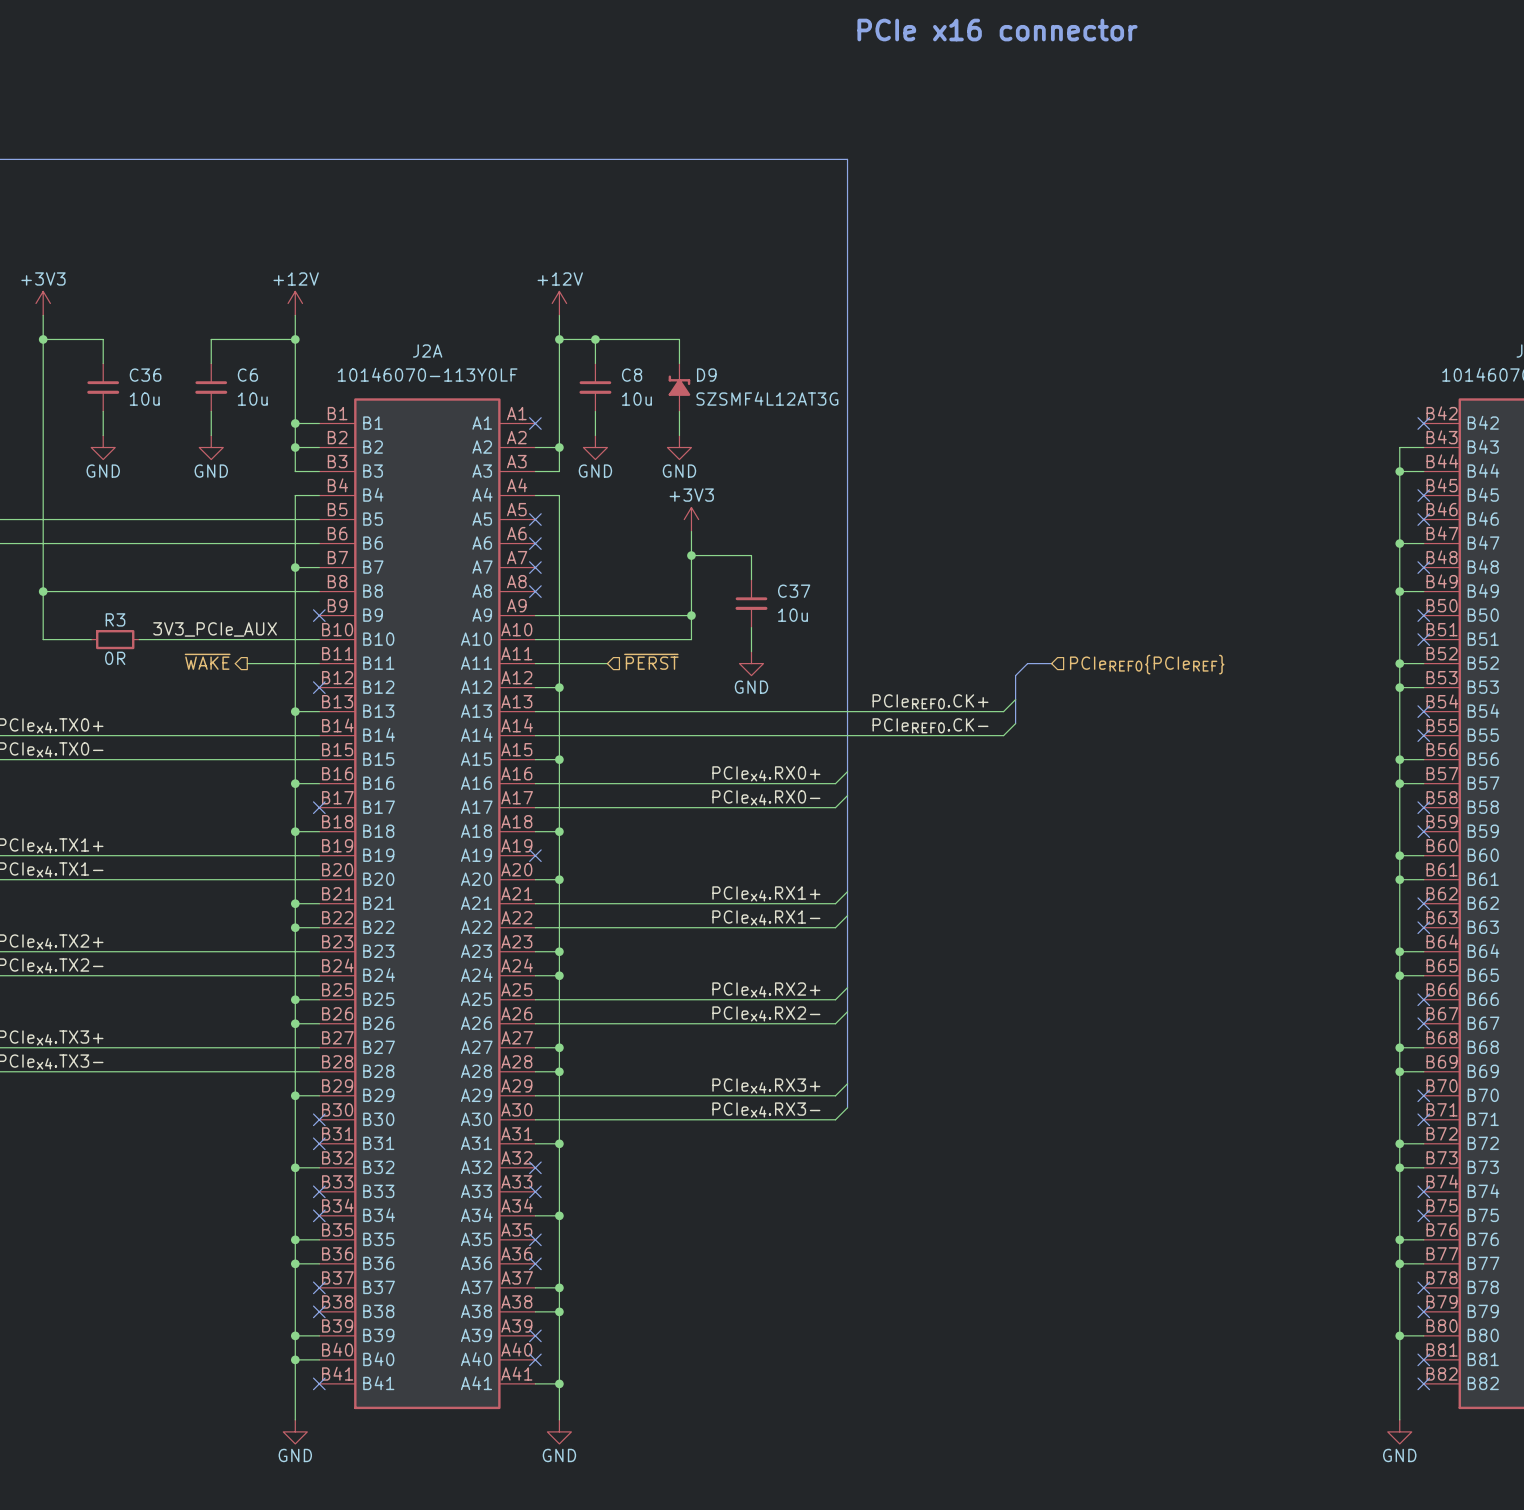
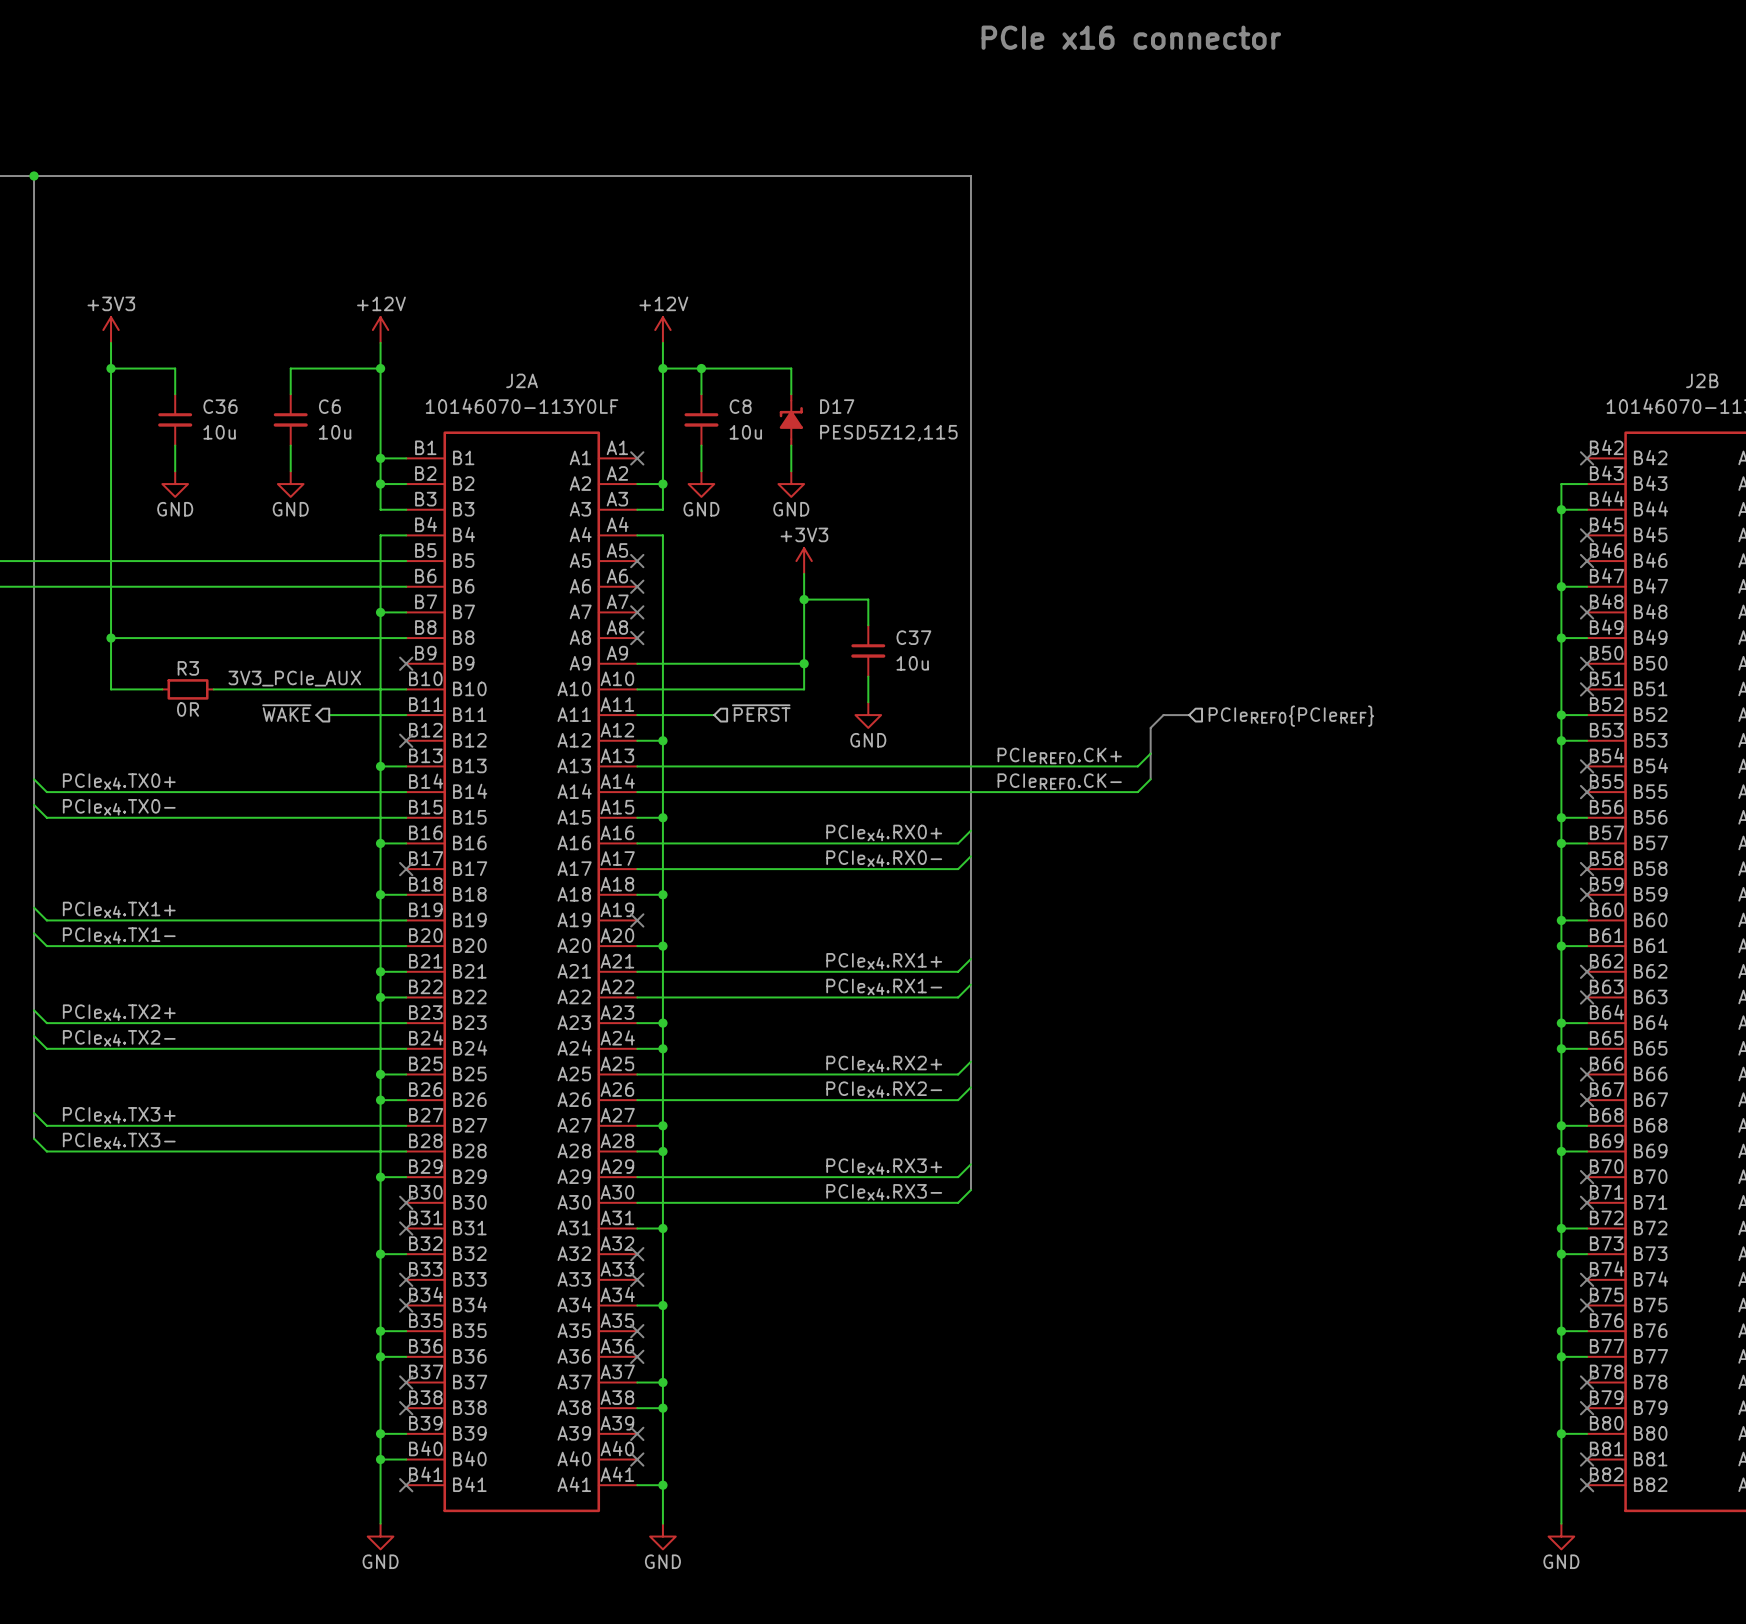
D9: (679, 387) -> none
D17: none -> (791, 419)

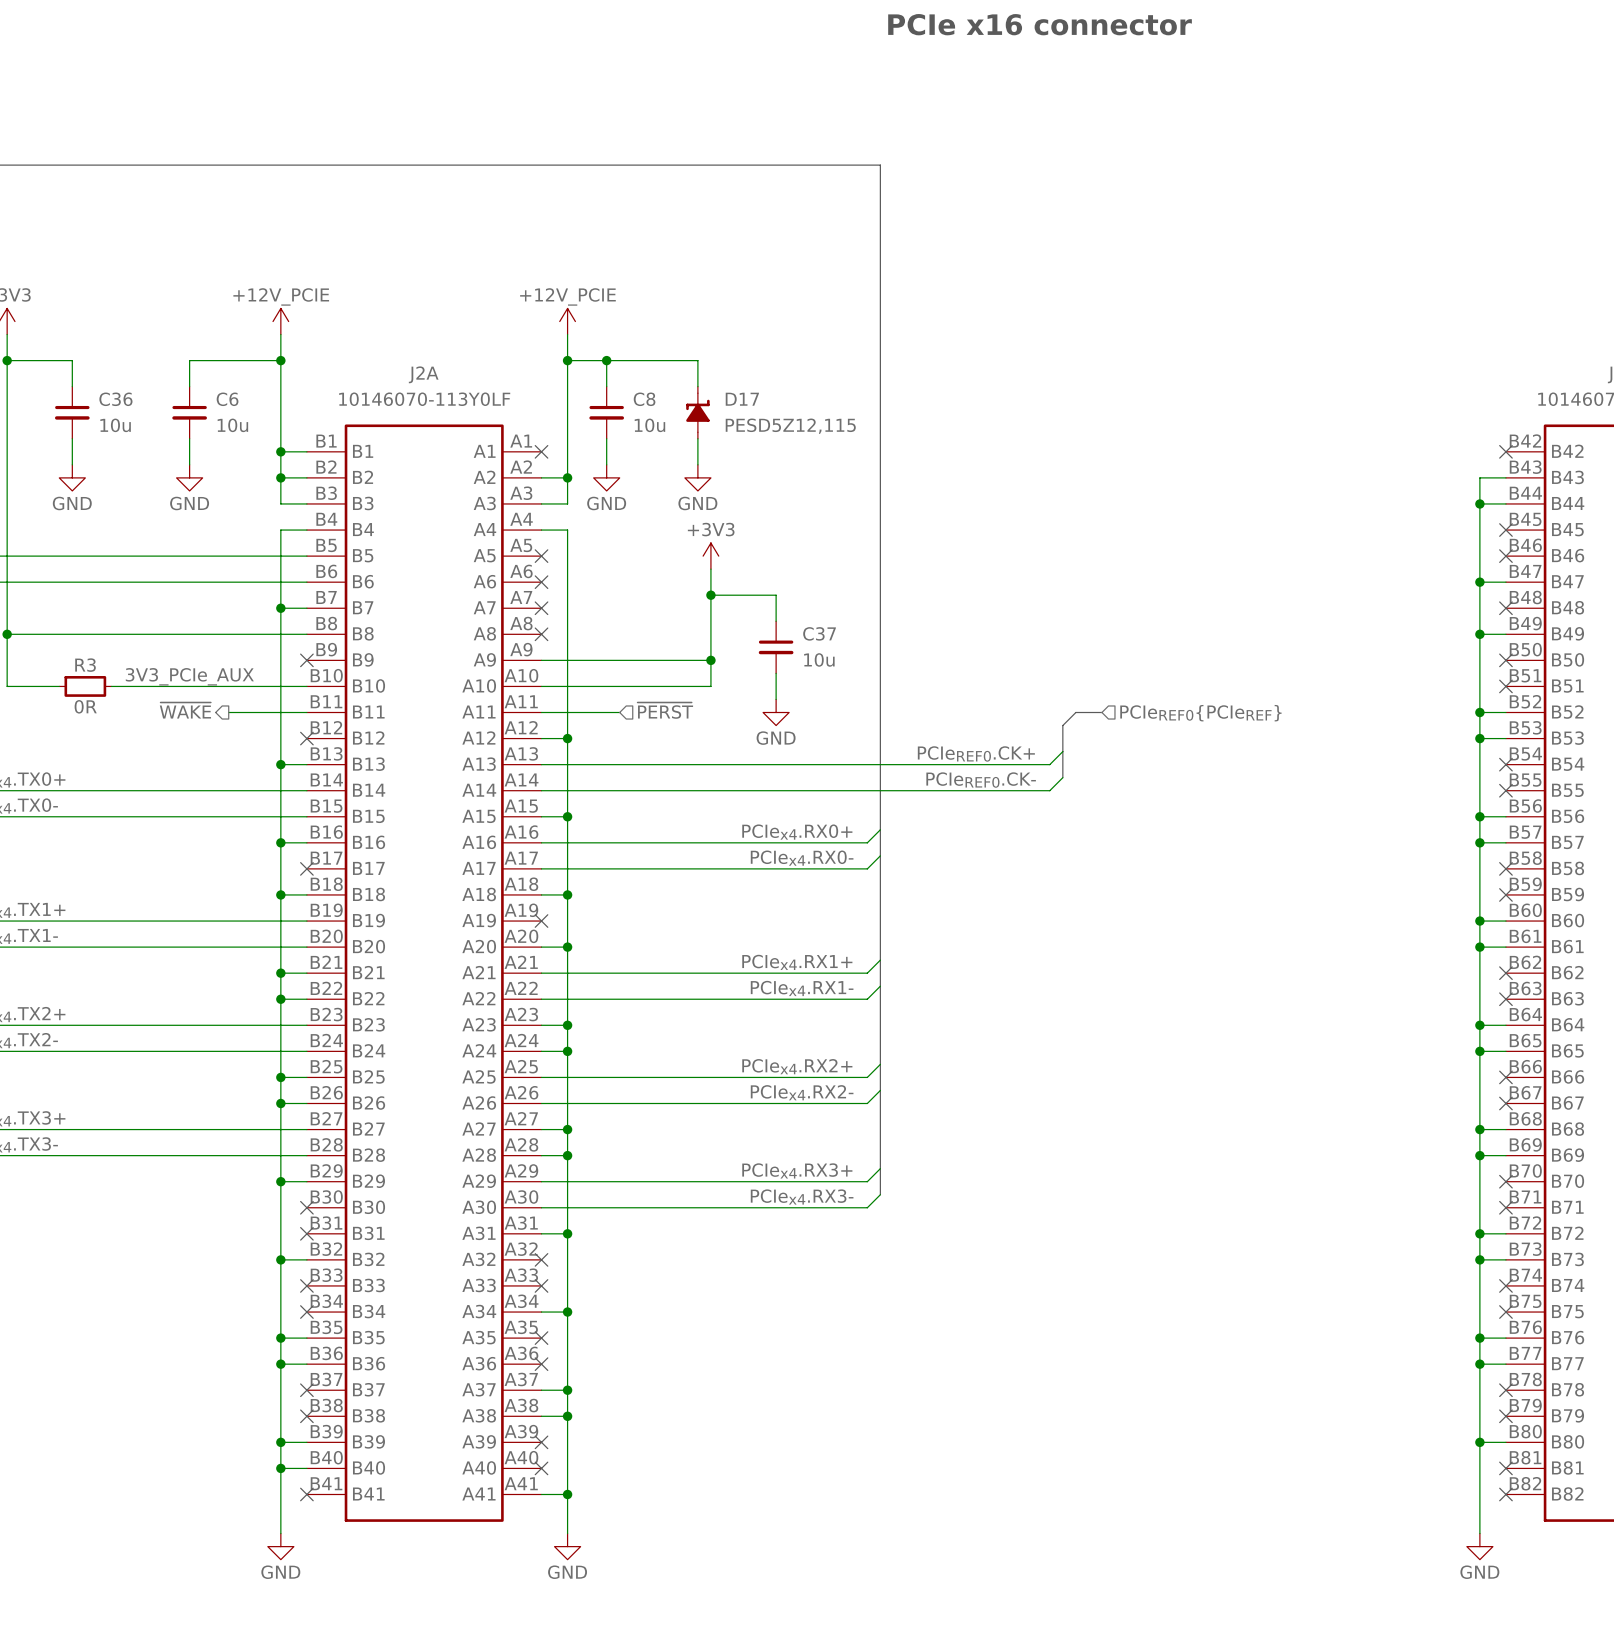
power symbol: +12V (380, 330) -> +12V_PCIE (280, 321)
power symbol: +12V (662, 330) -> +12V_PCIE (567, 321)

